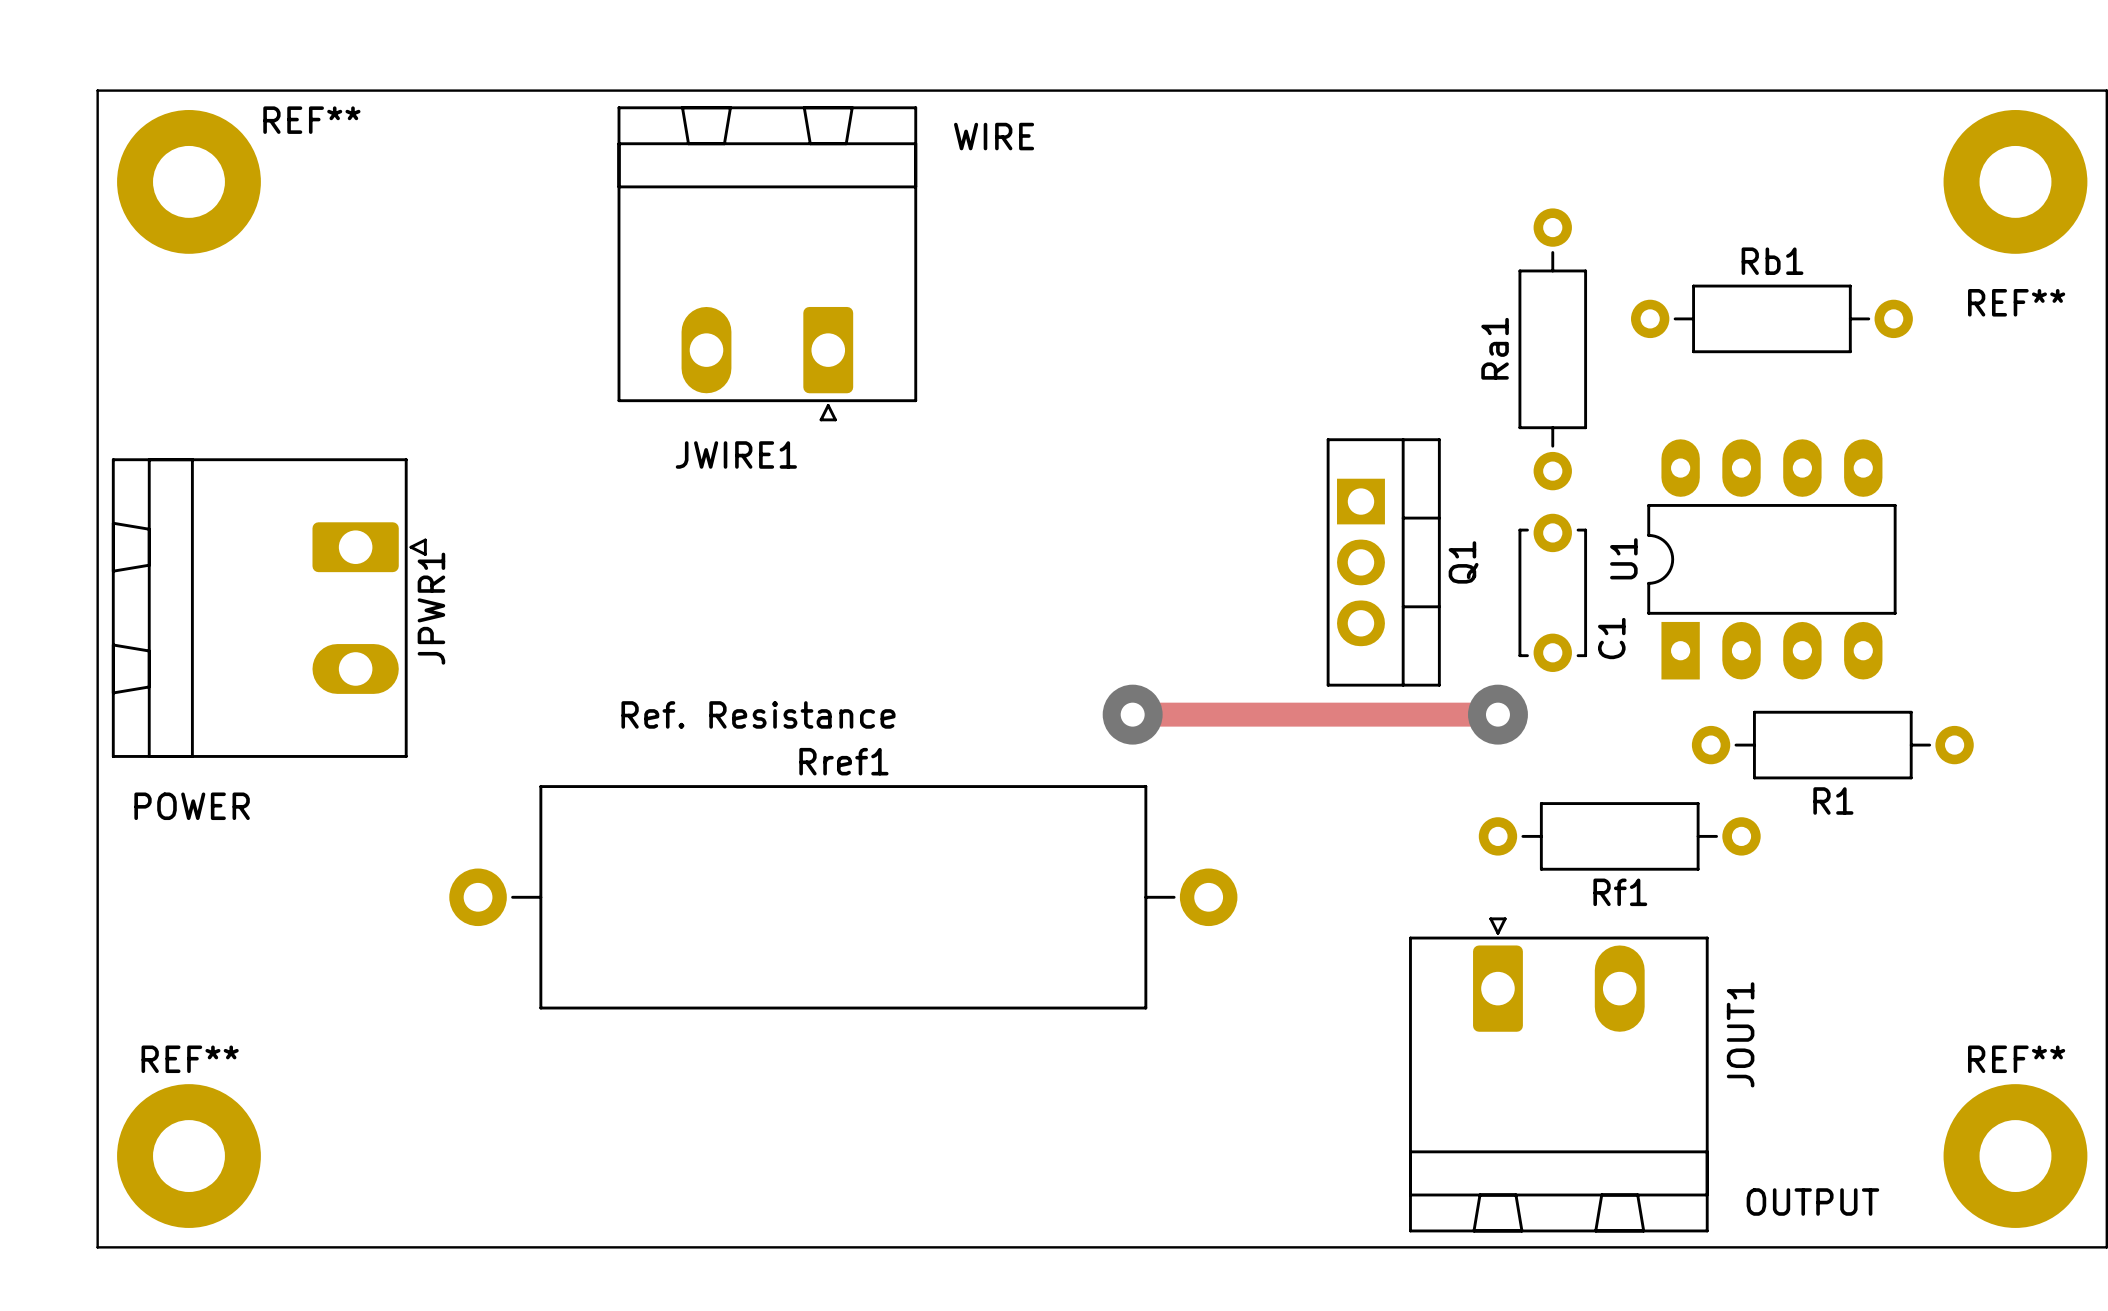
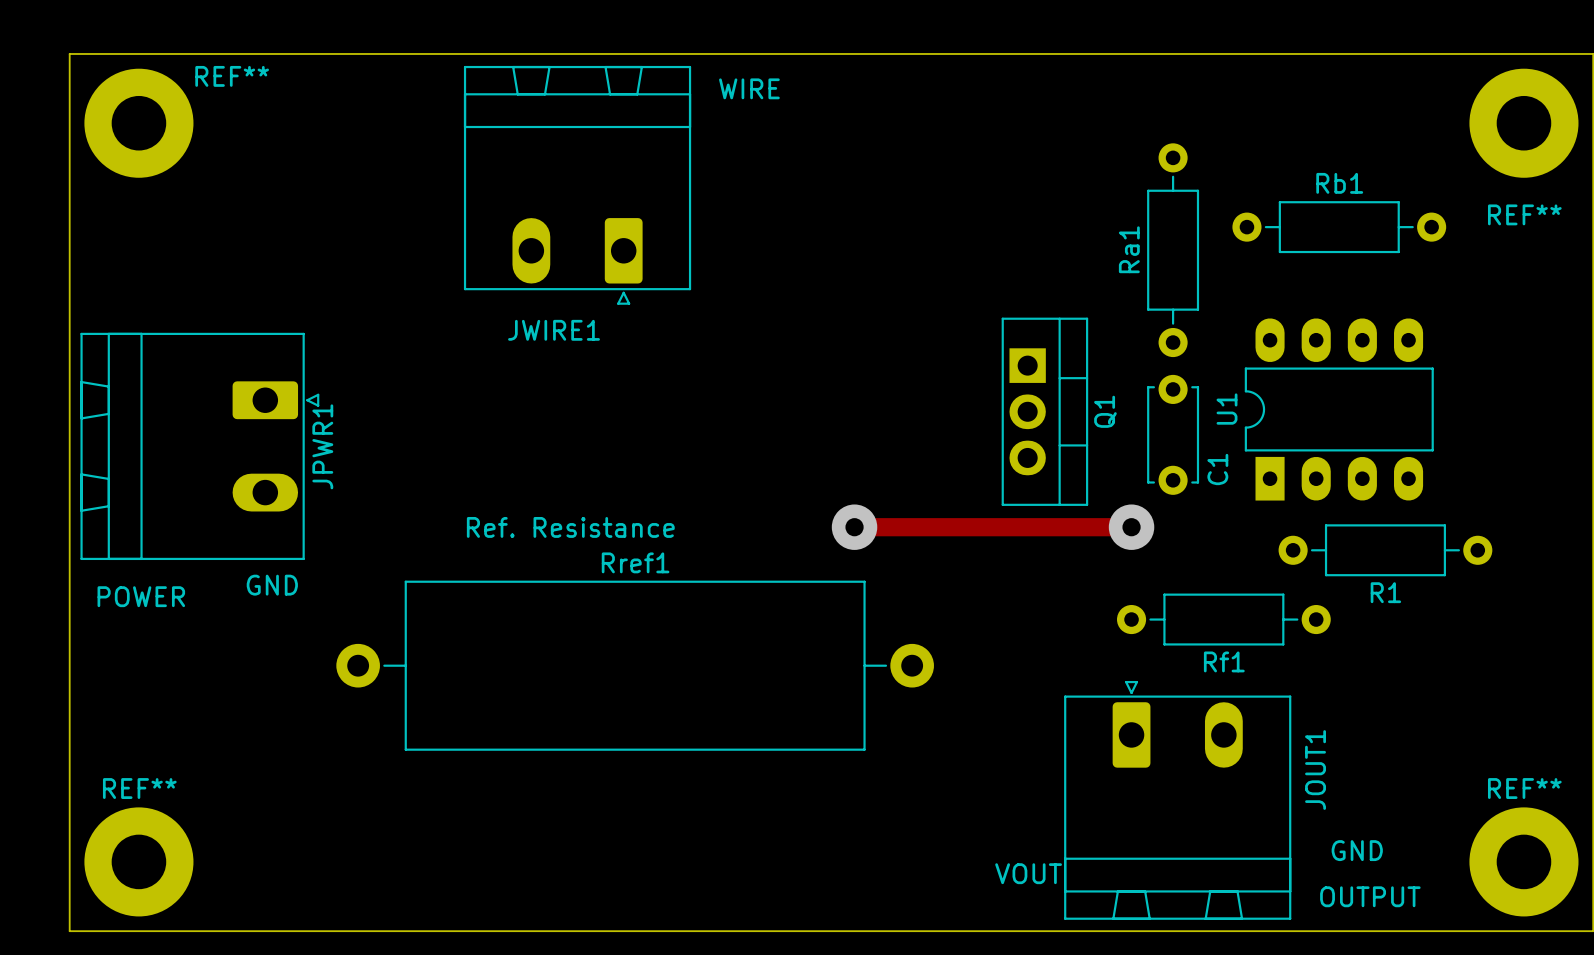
text: none -> GND (272, 585)
text: none -> GND (1357, 850)
text: none -> VOUT (1028, 873)

